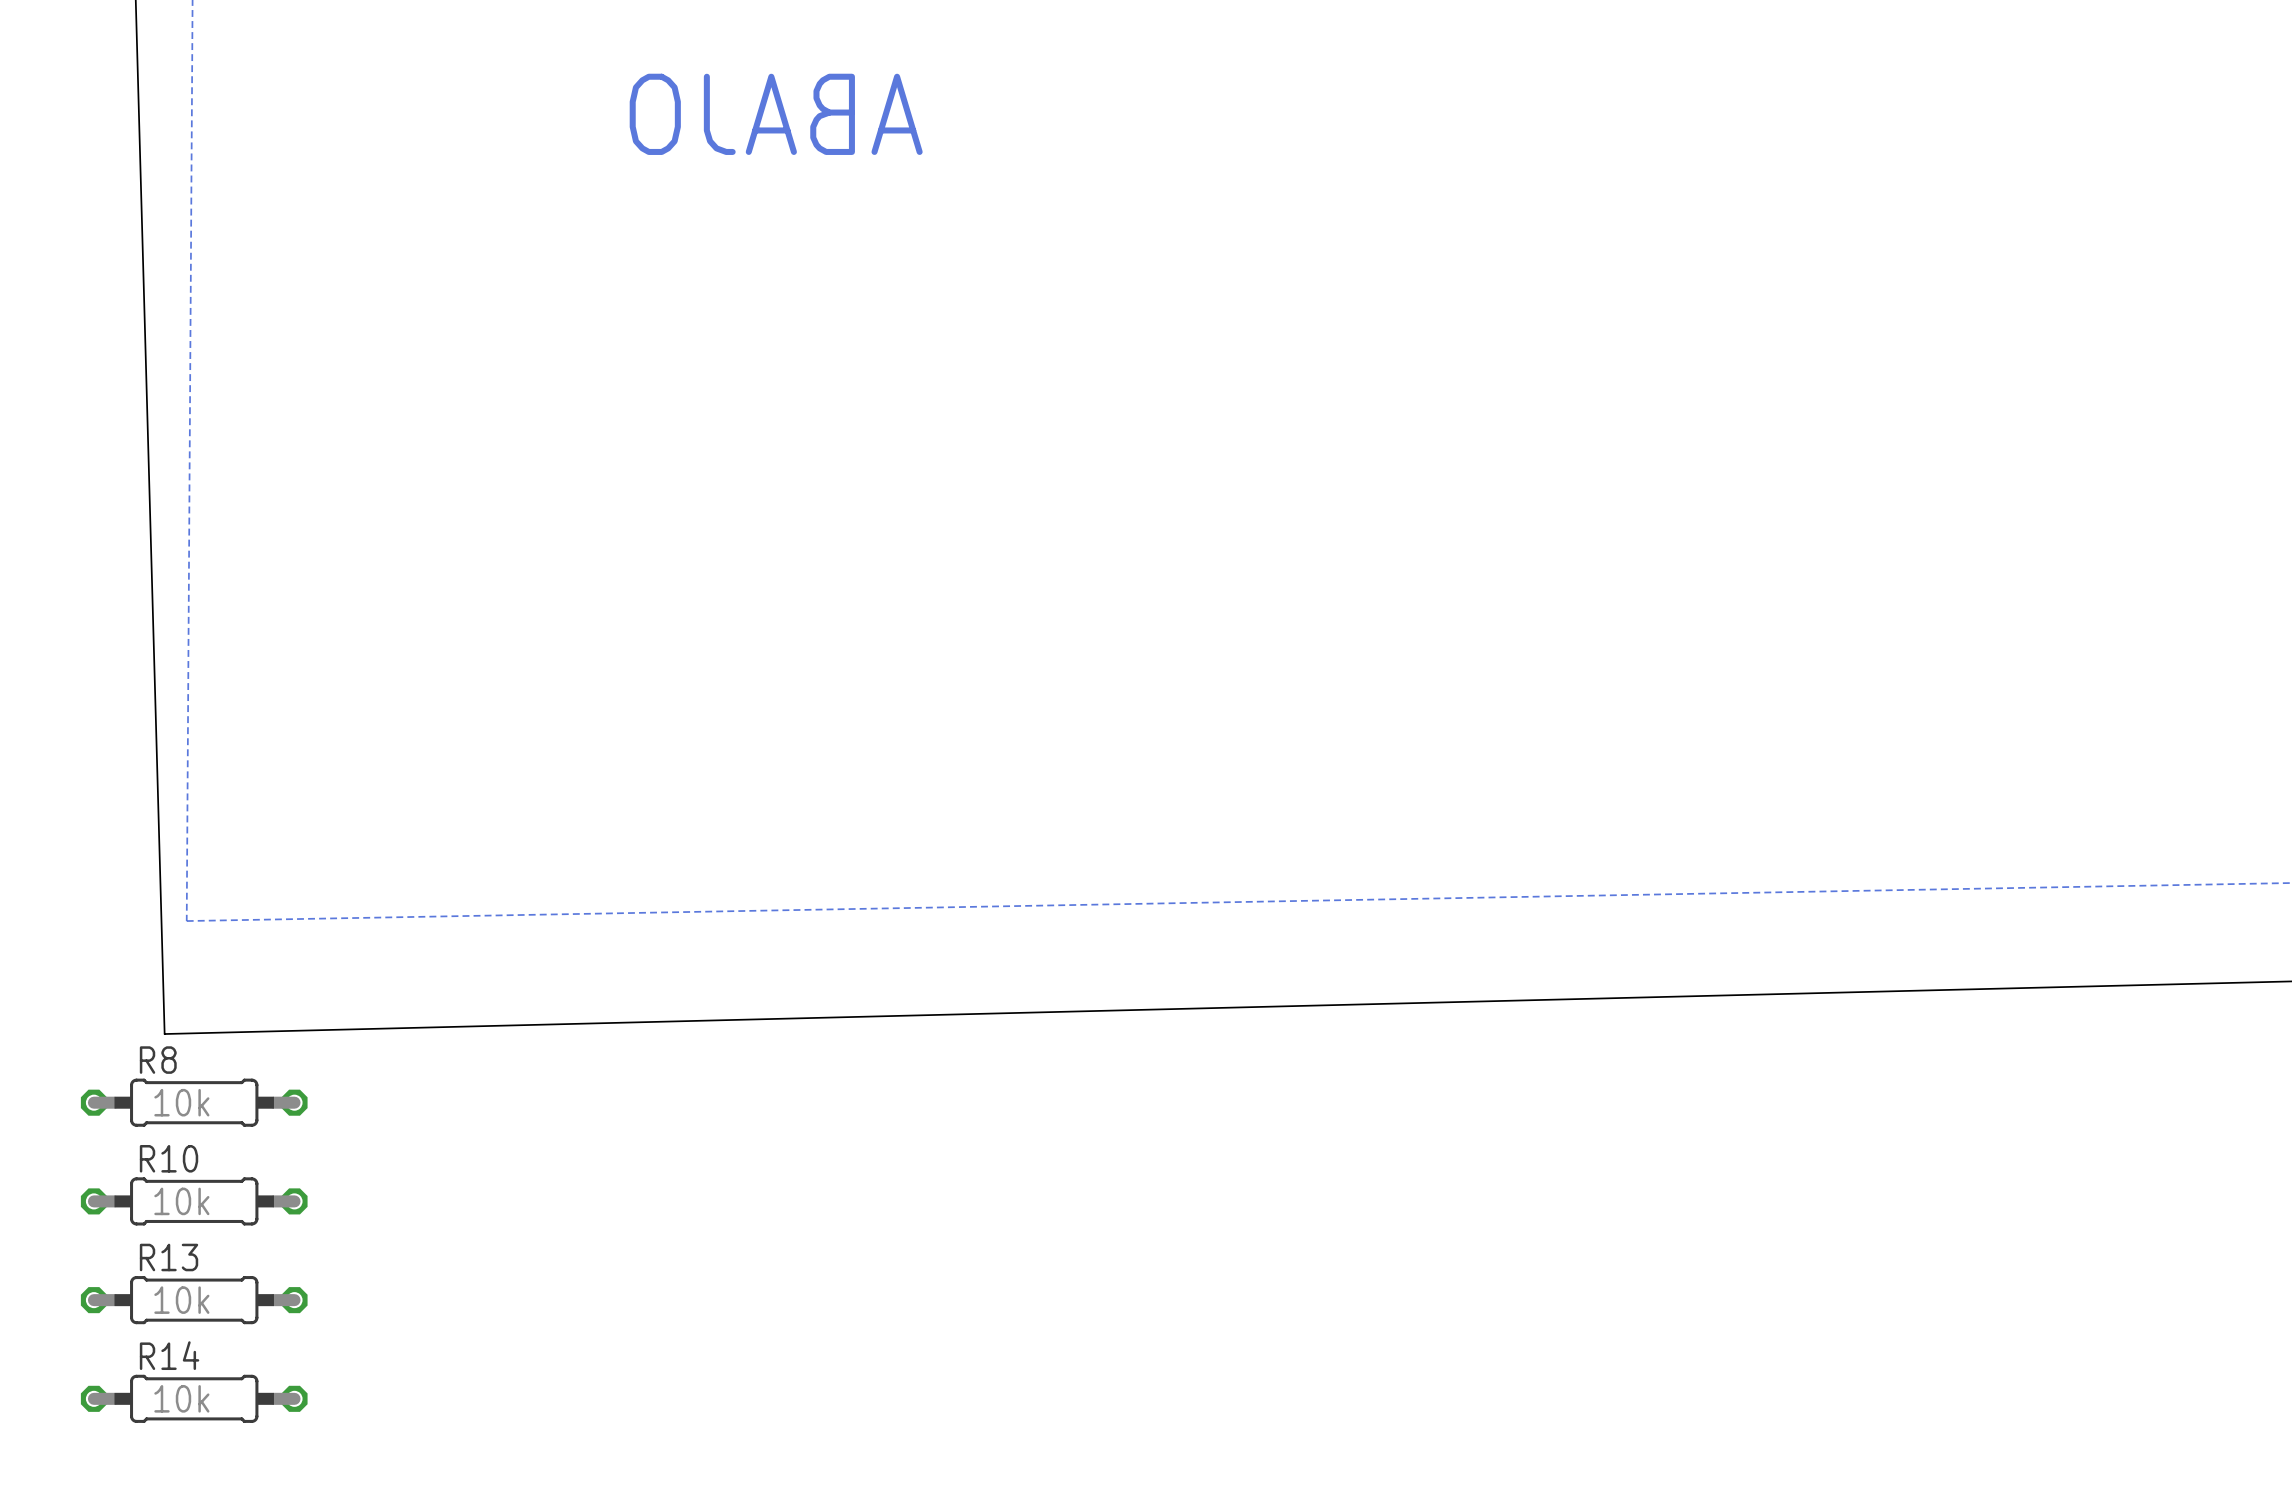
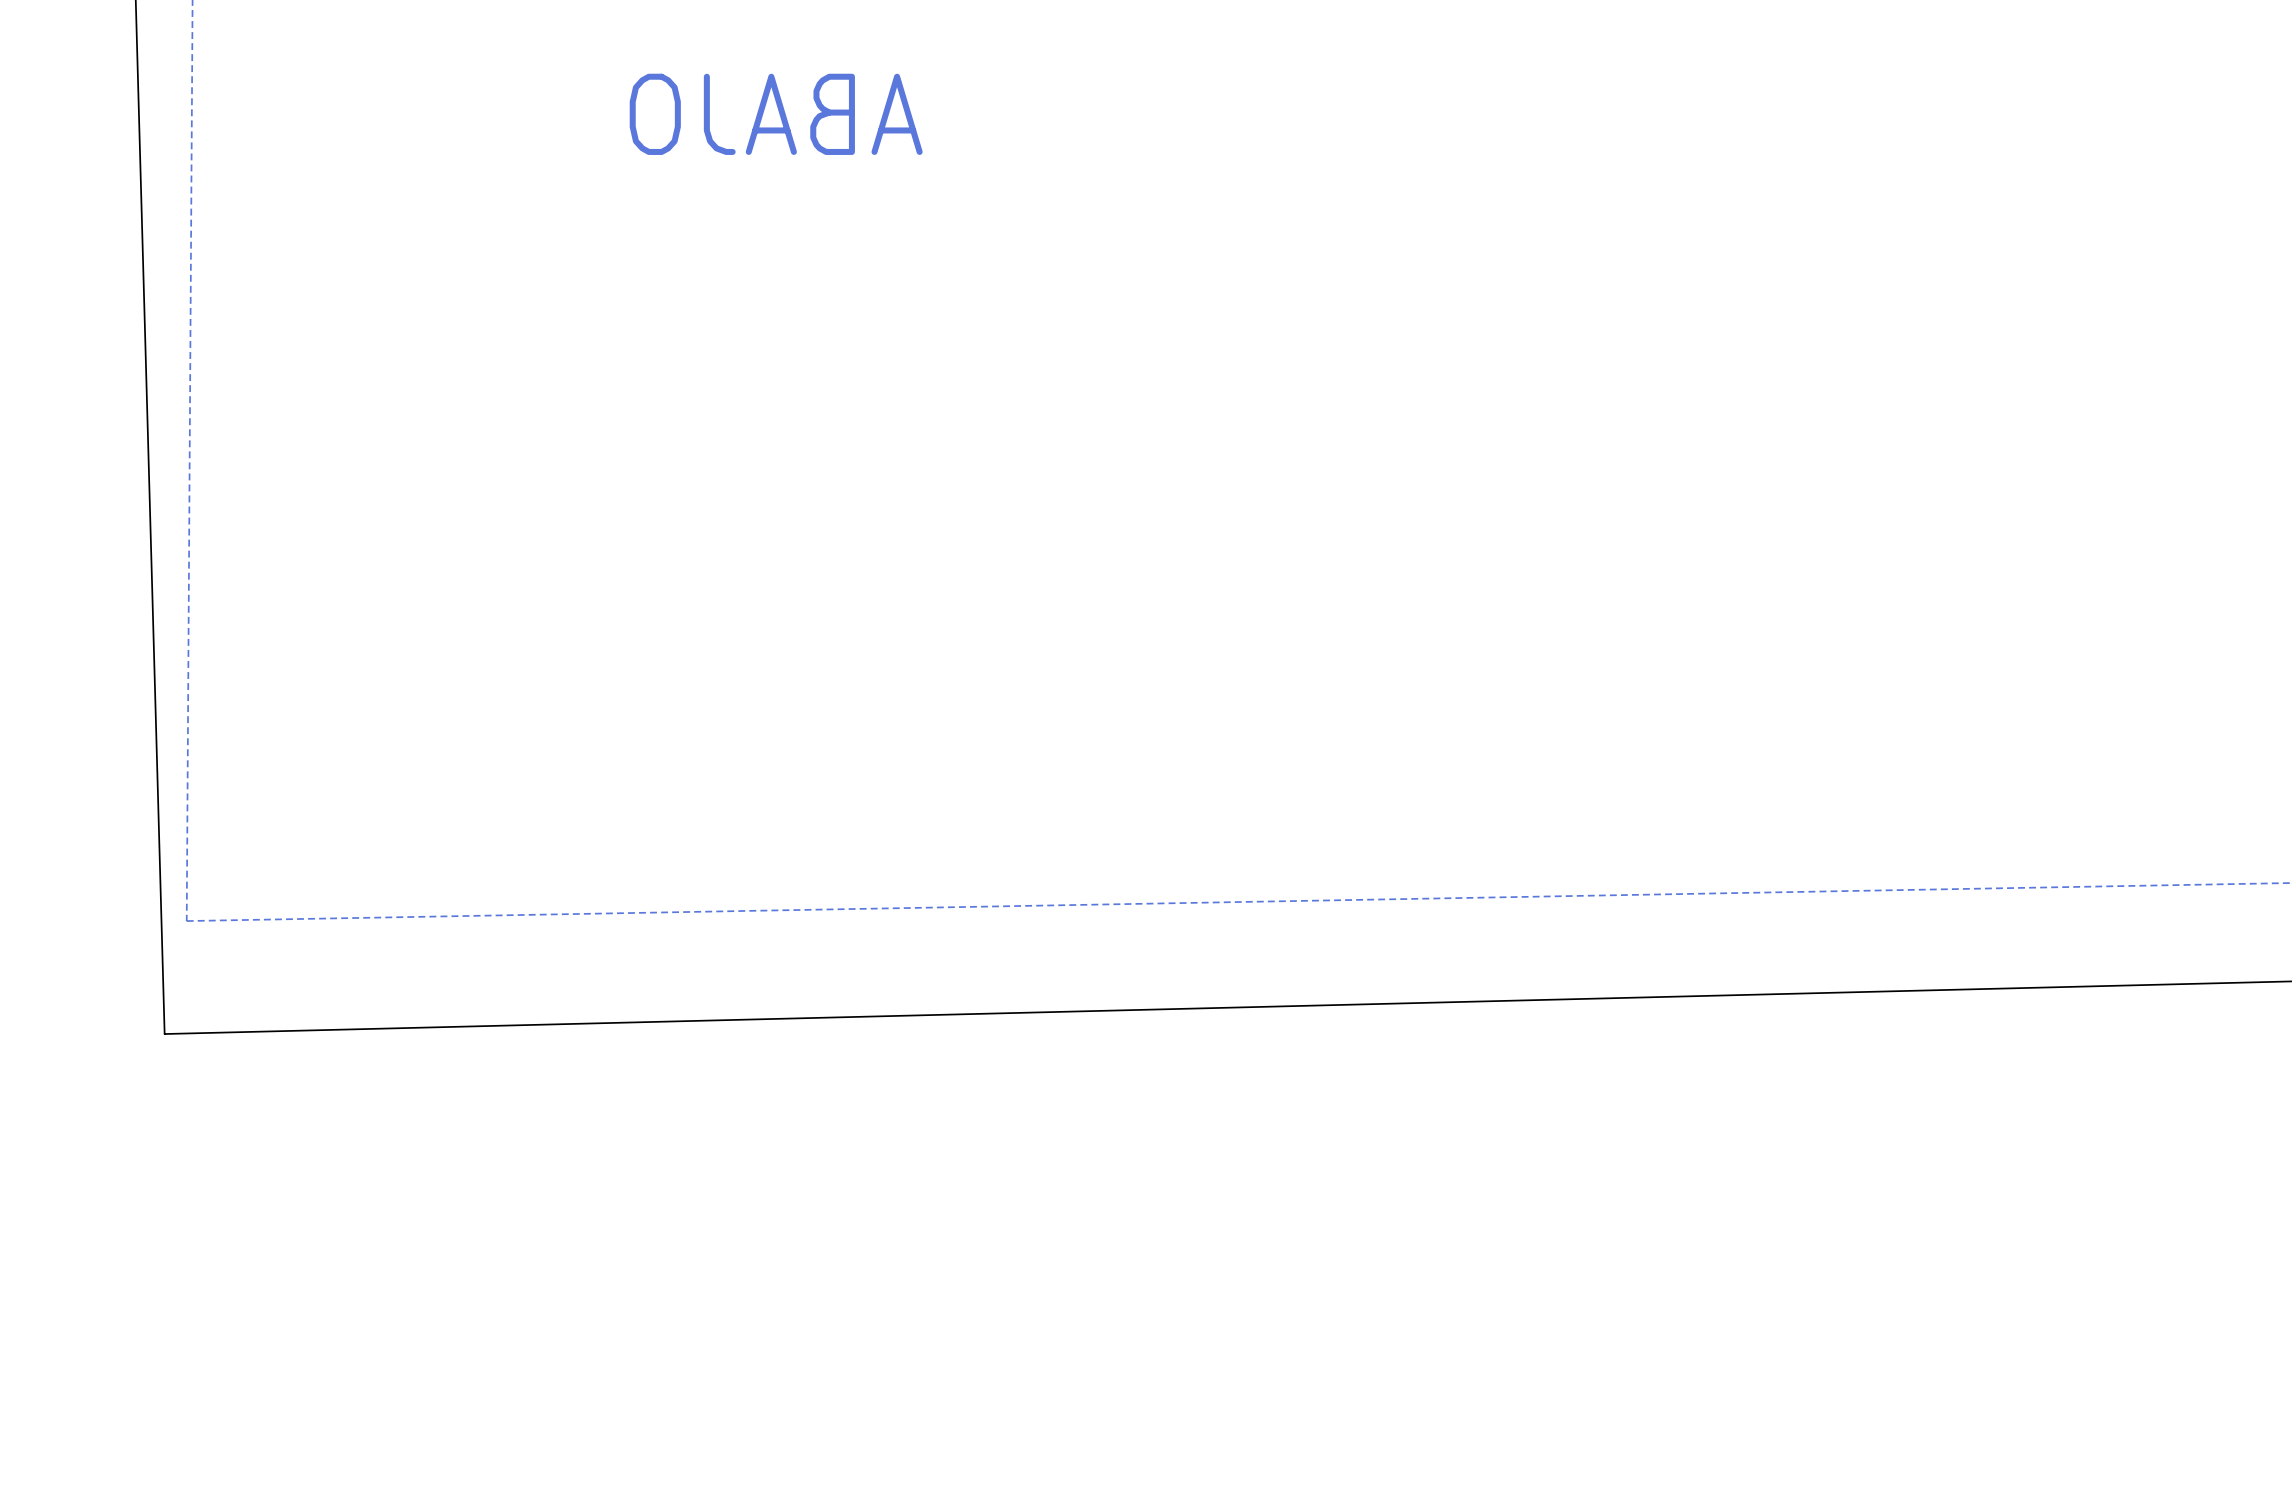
R8: 10k (194, 1102) -> none
R10: 10k (194, 1201) -> none
R13: 10k (194, 1300) -> none
R14: 10k (194, 1398) -> none

